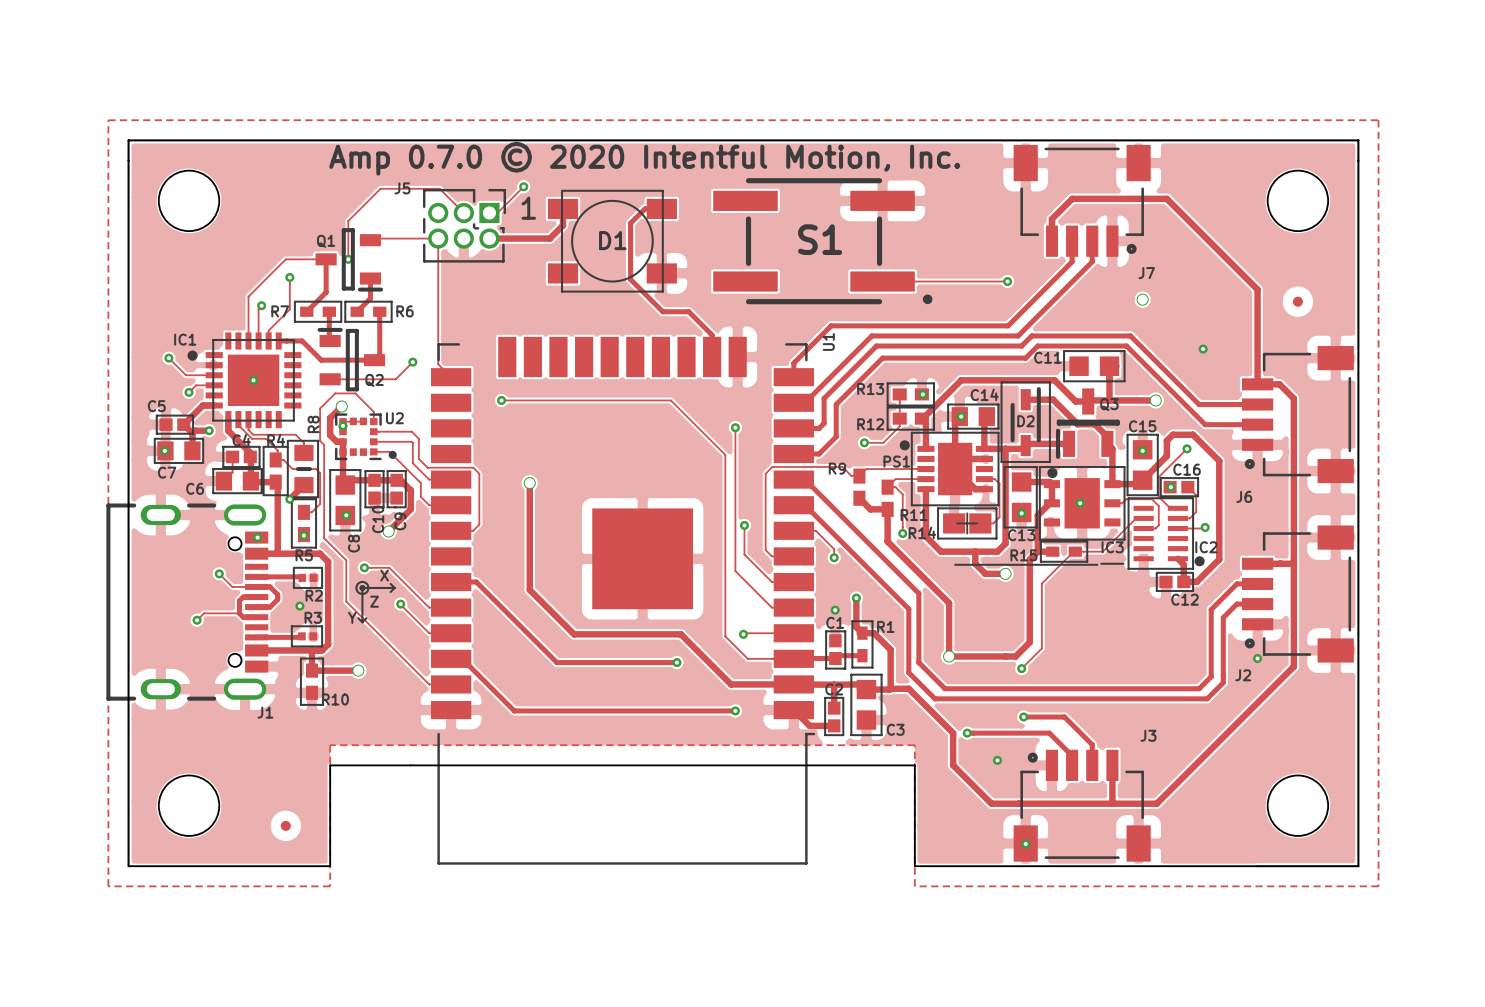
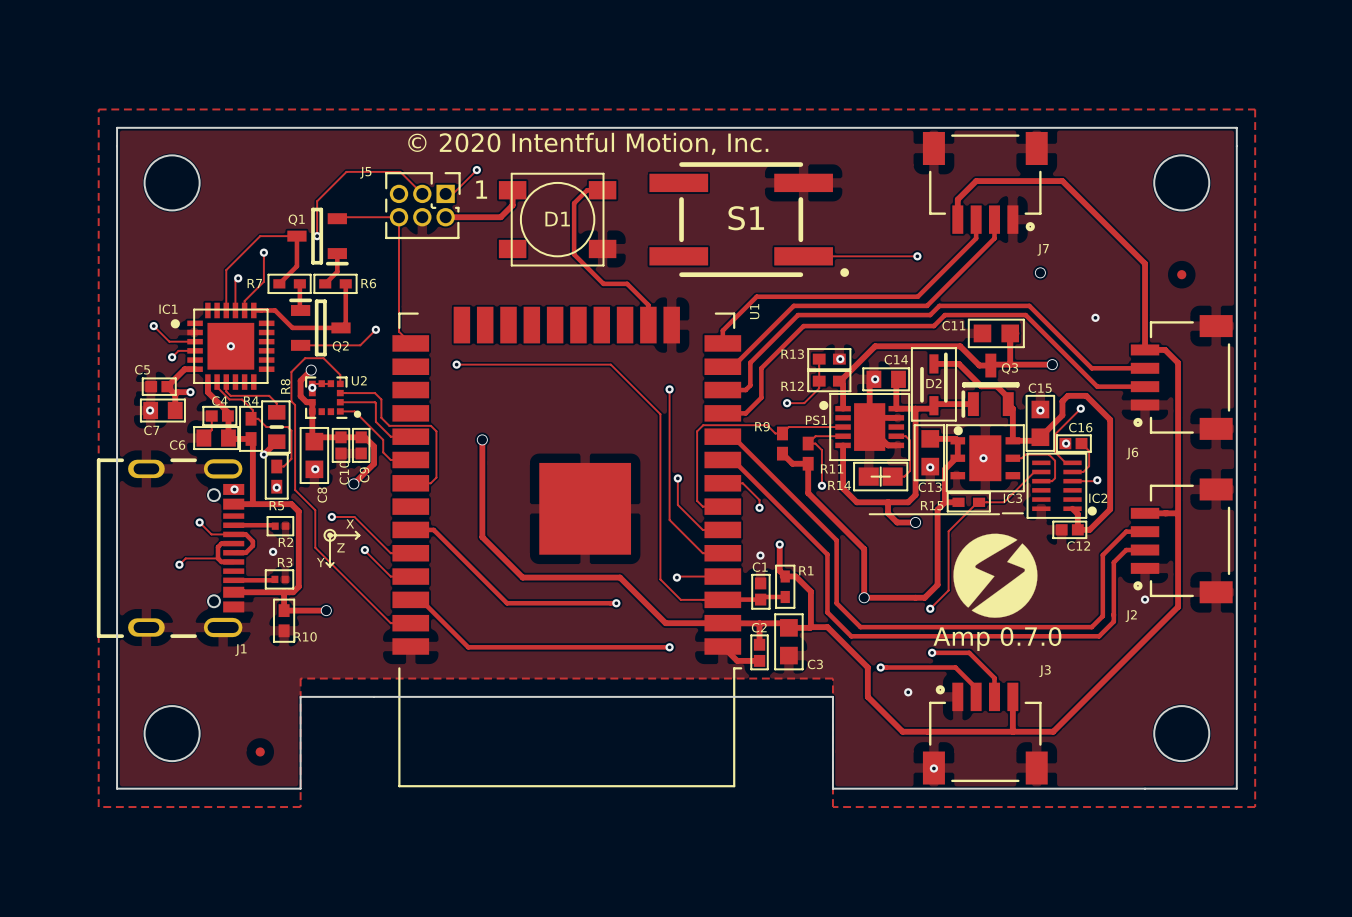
text: Amp 0.7.0 © 2020 Intentful Motion, Inc. (644, 158) -> © 2020 Intentful Motion, Inc. (588, 143)
drawing: none -> [953, 533, 1038, 618]
text: none -> Amp 0.7.0 (997, 638)

